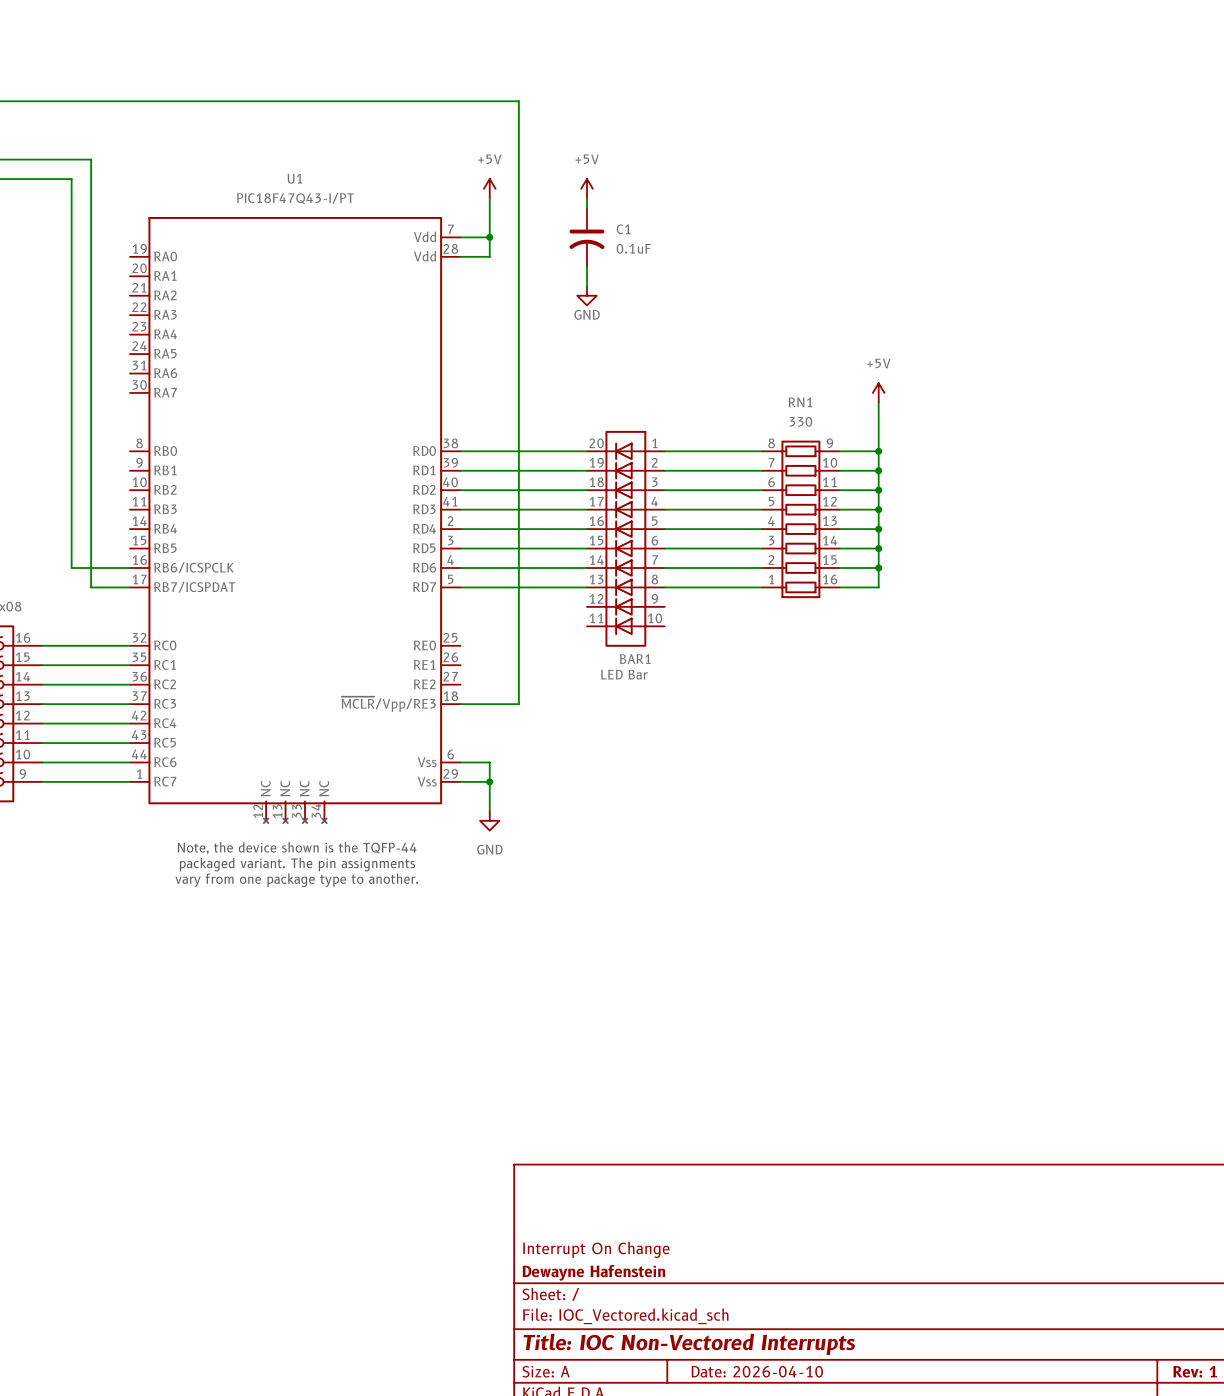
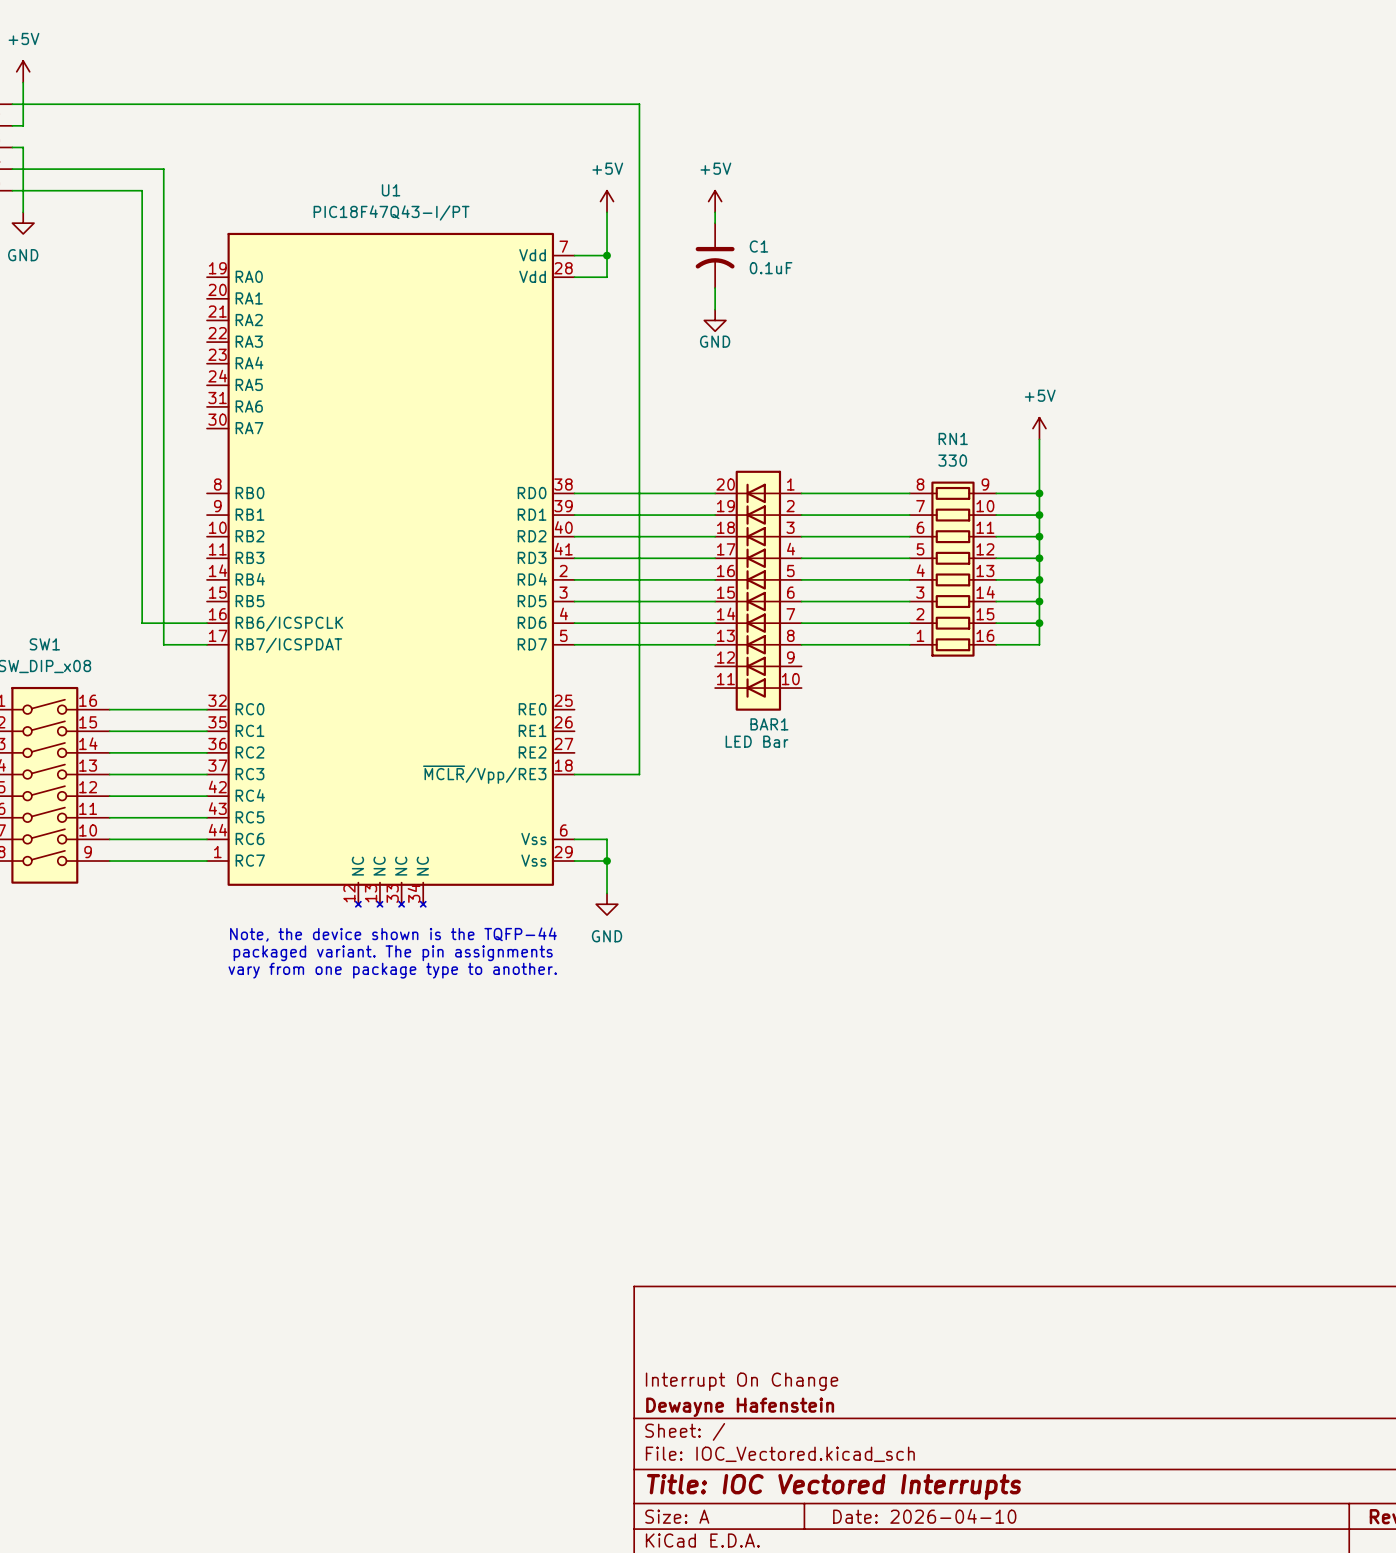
title block: Title: IOC Non-Vectored Interrupts (689, 1344) -> Title: IOC Vectored Interrupts (833, 1487)

